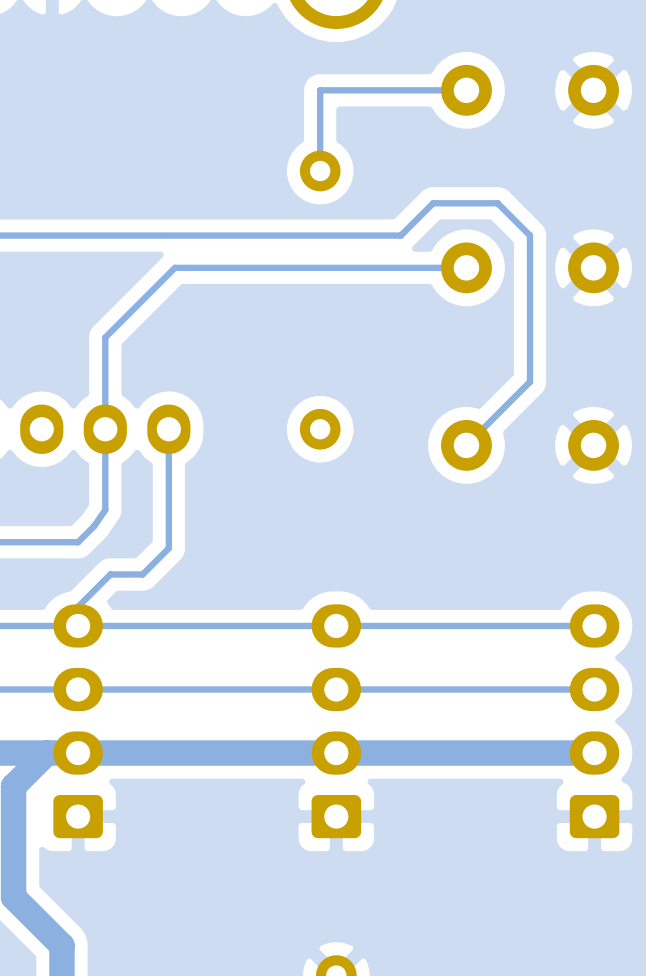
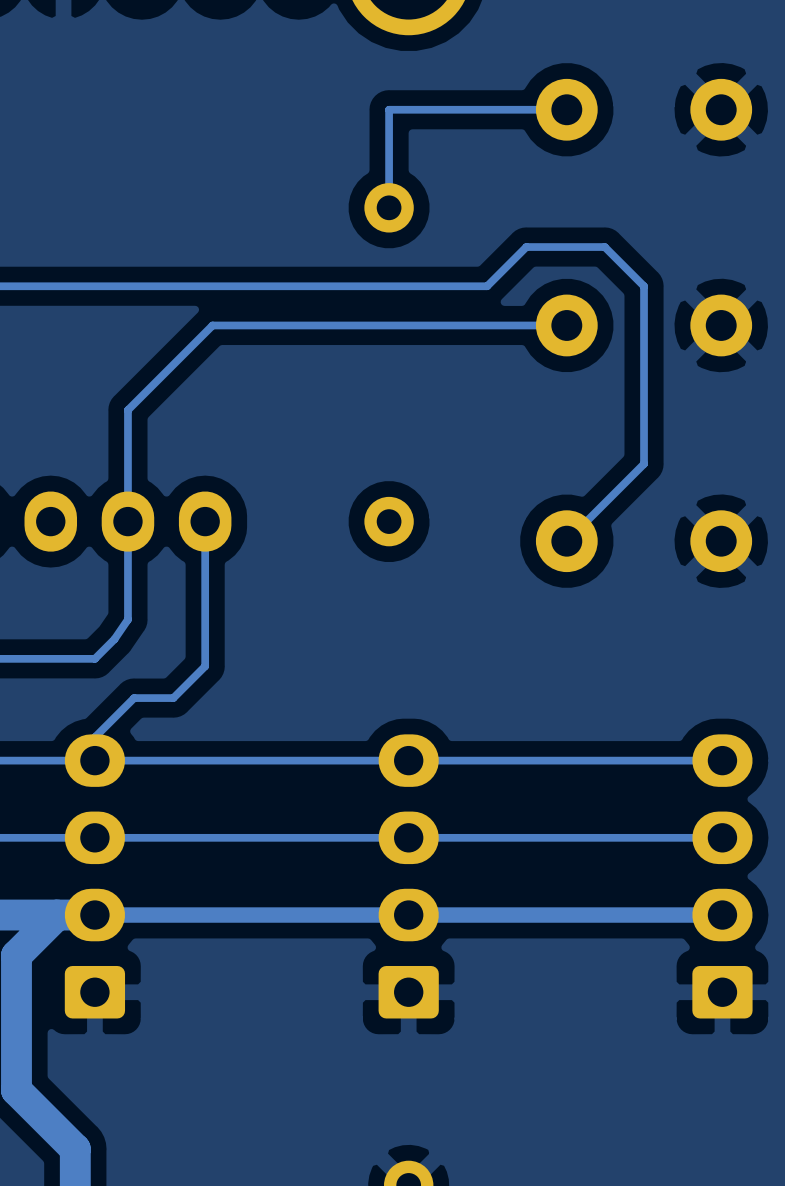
track width: thick (594, 753) (78, 753) -> thin (722, 915) (94, 915)

